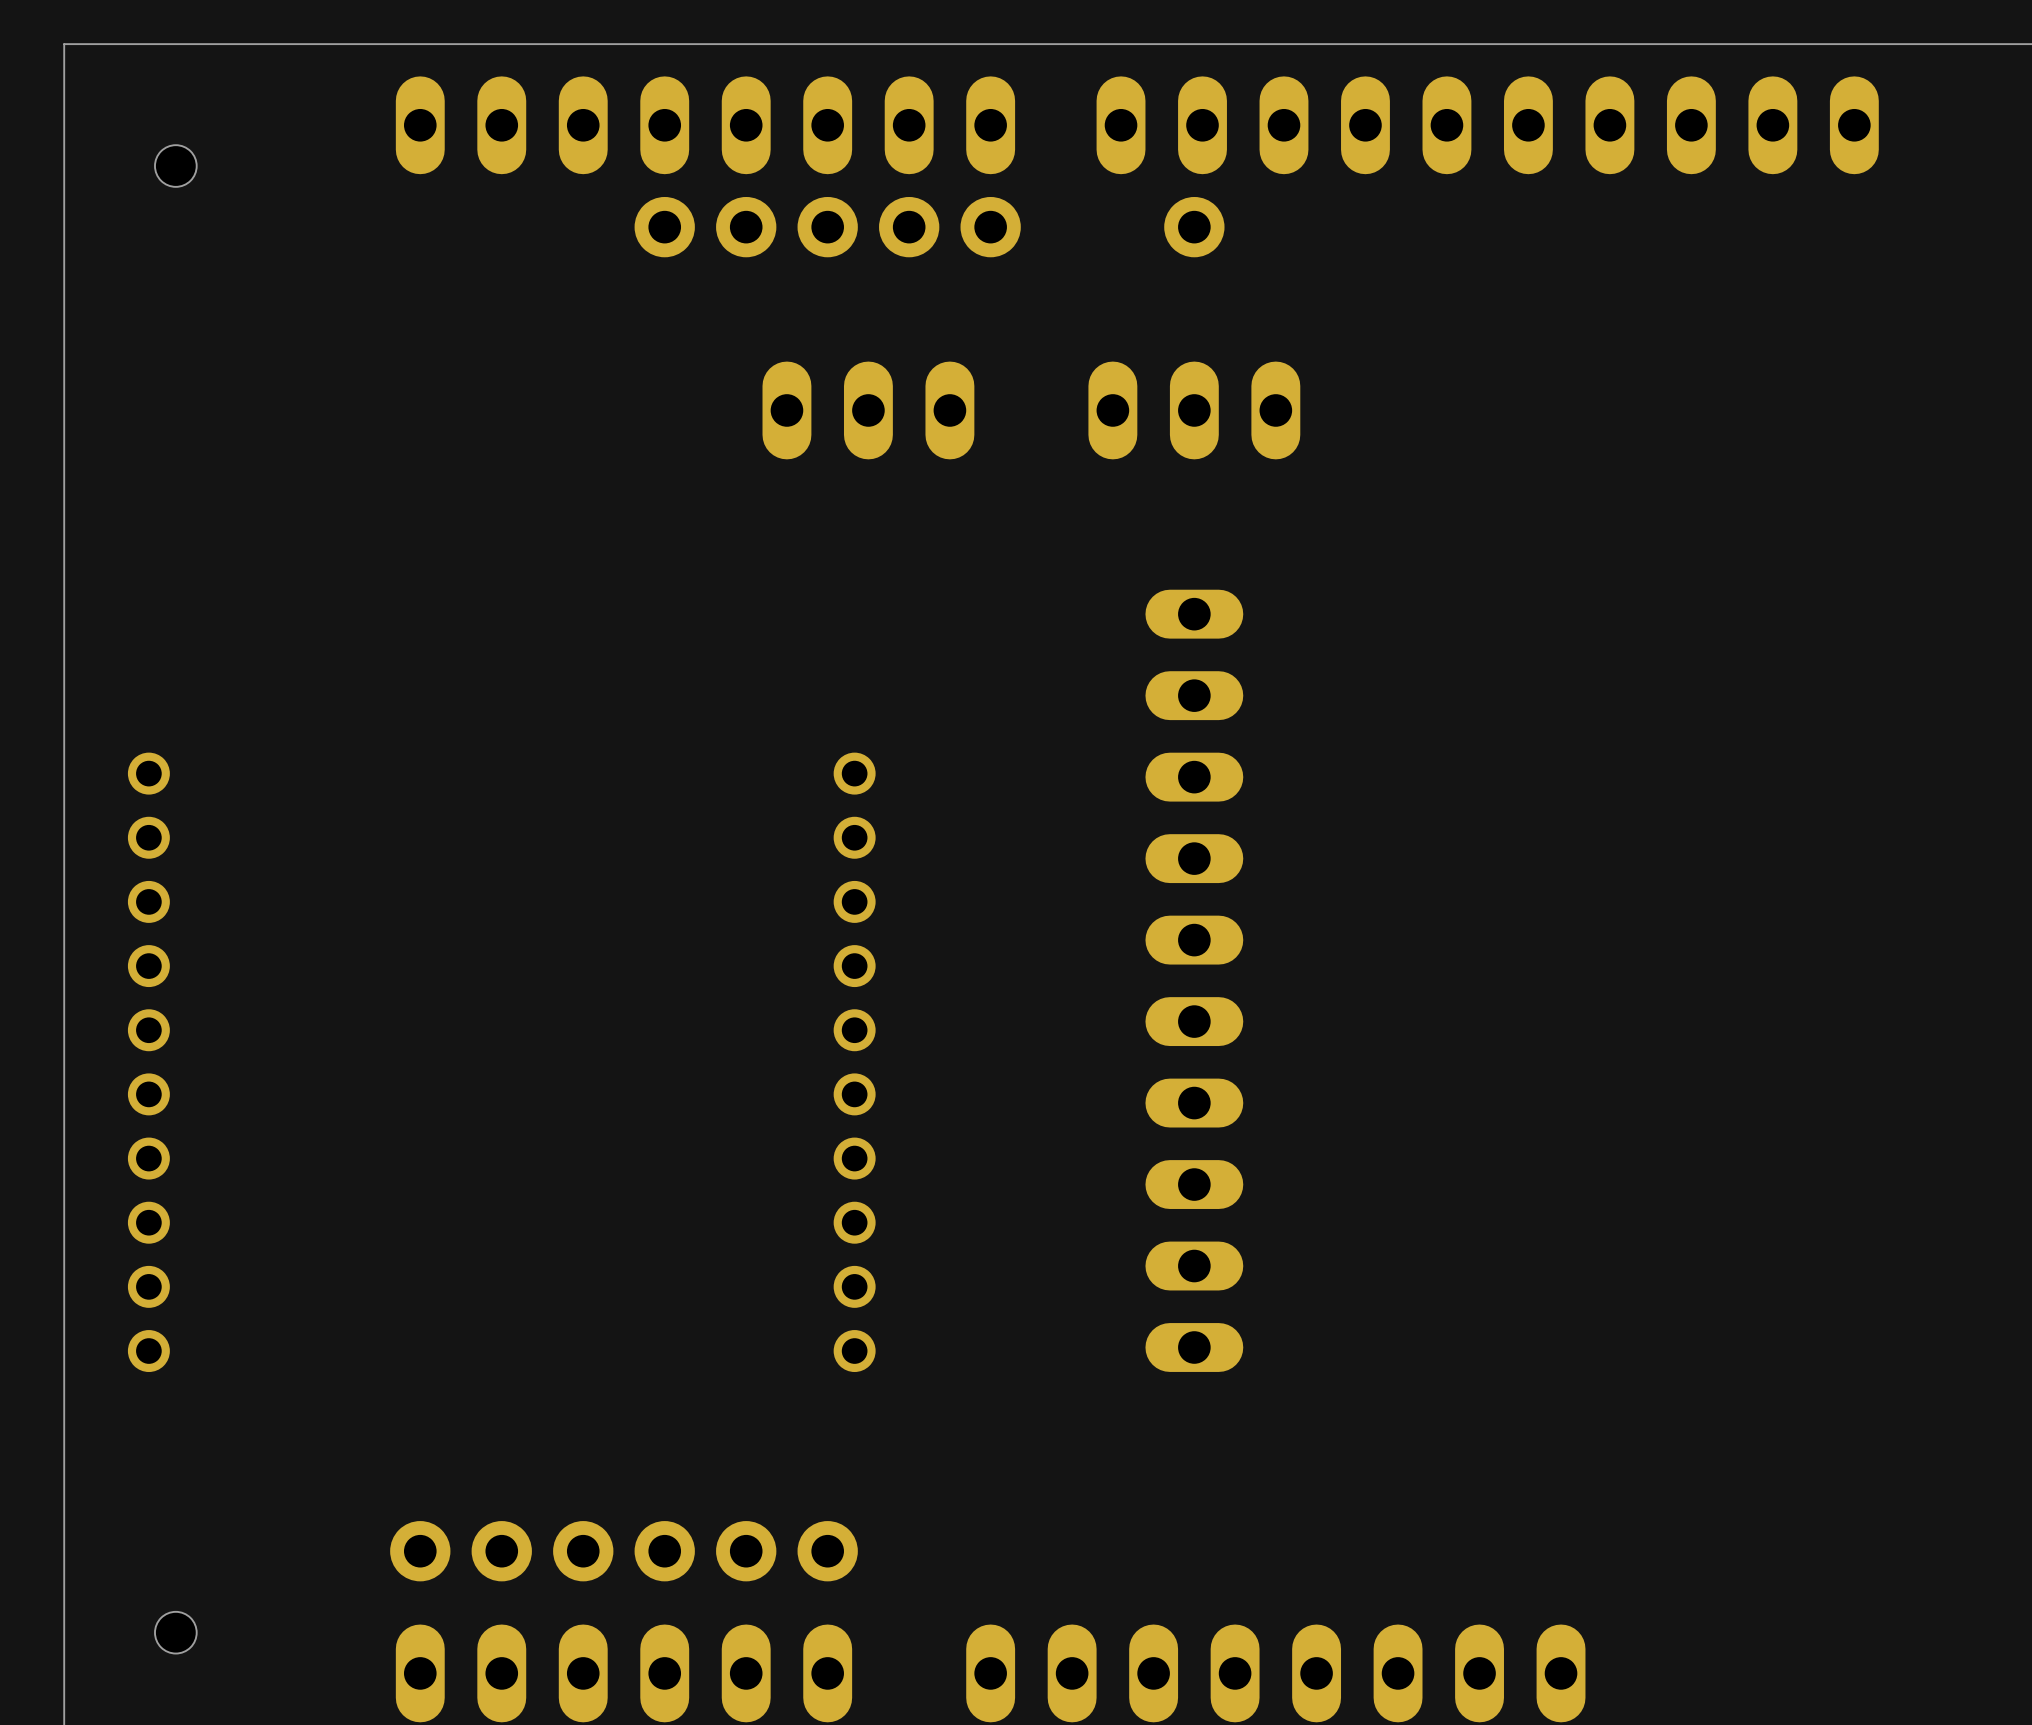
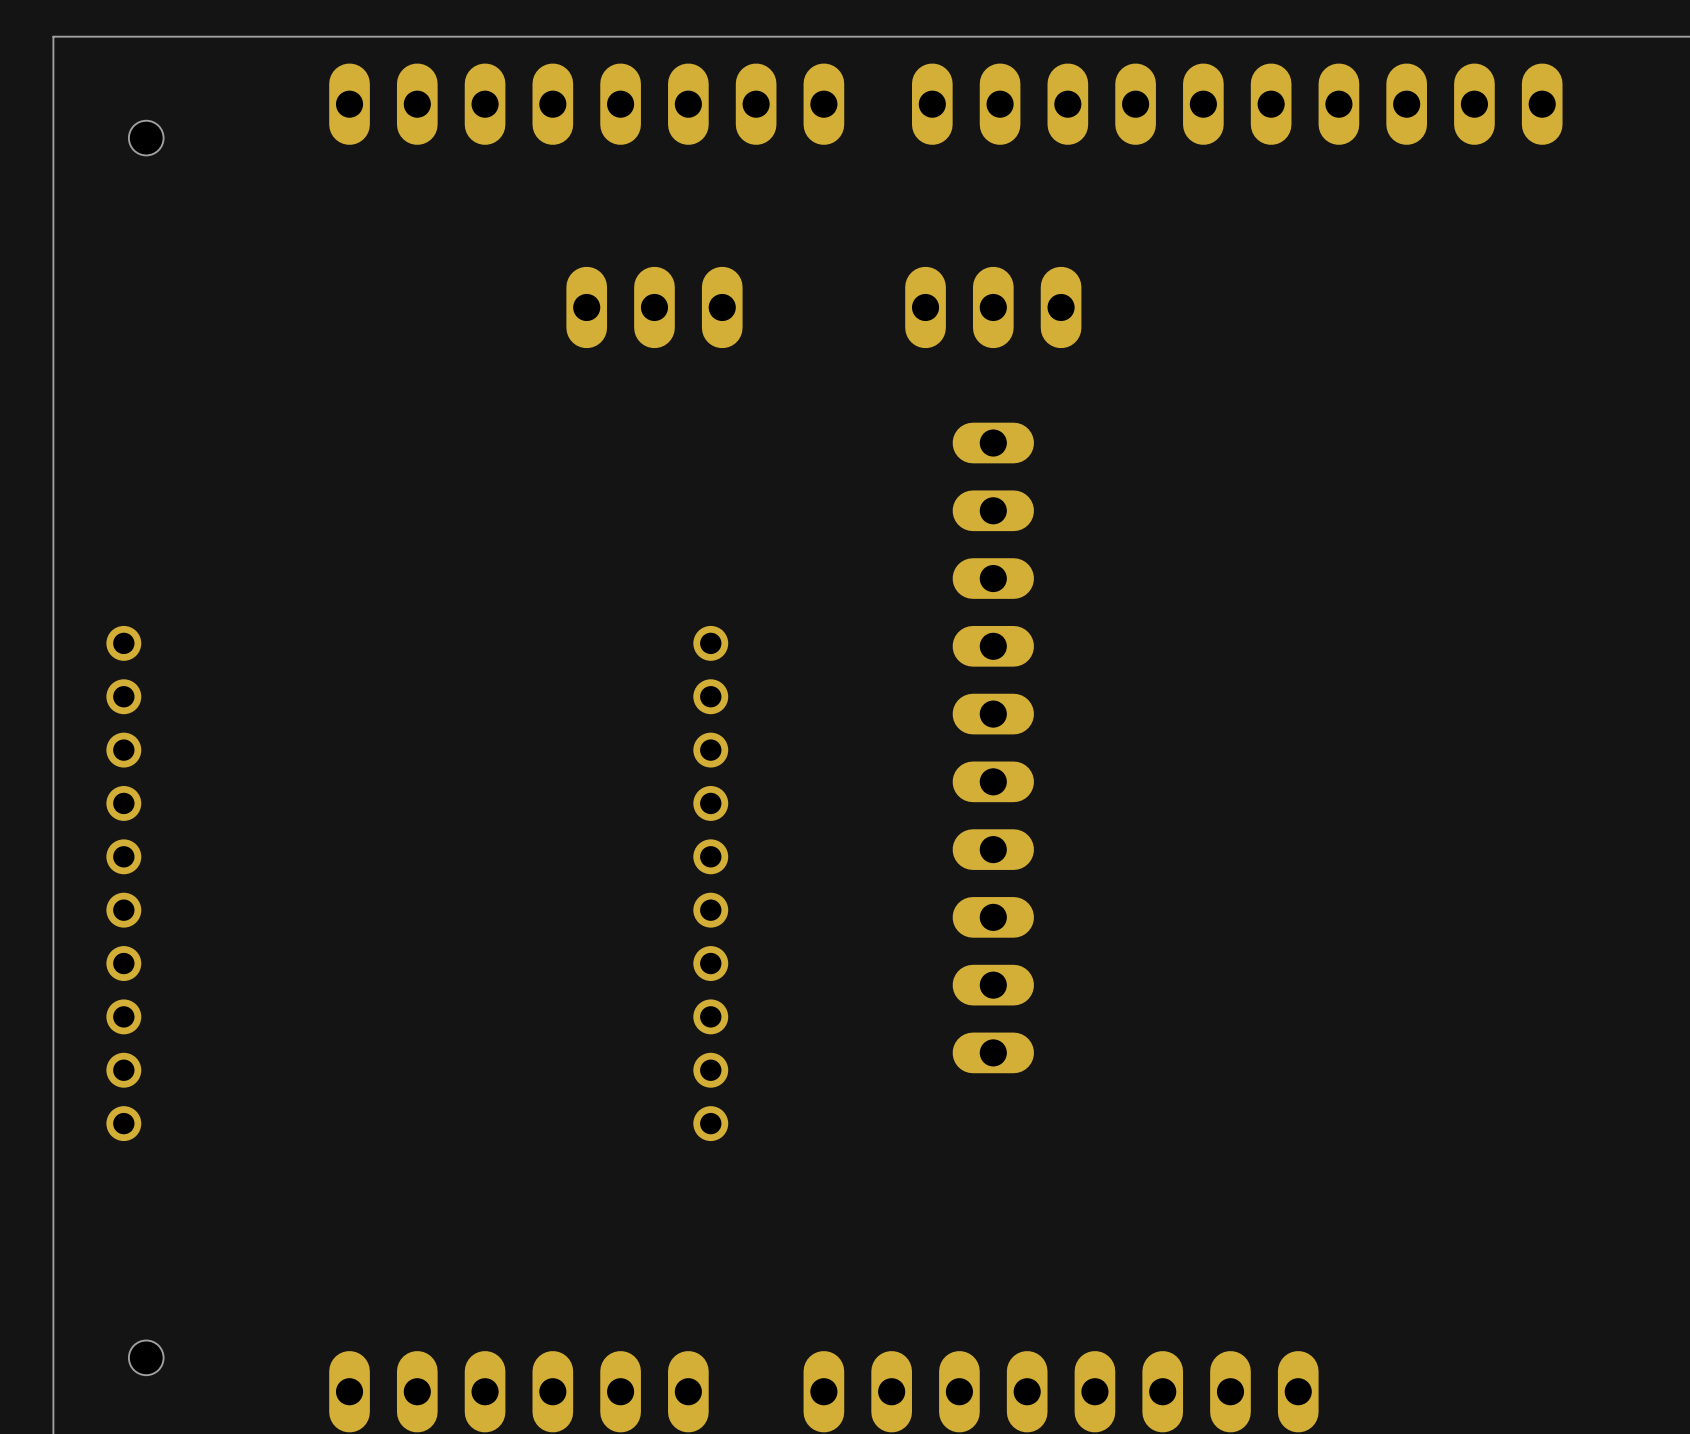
part: (827, 227) -> none
part: (1194, 227) -> none
part position: (868, 410) -> (654, 307)
part position: (1194, 410) -> (993, 307)
part position: (1194, 980) -> (993, 747)
part: (623, 1551) -> none

